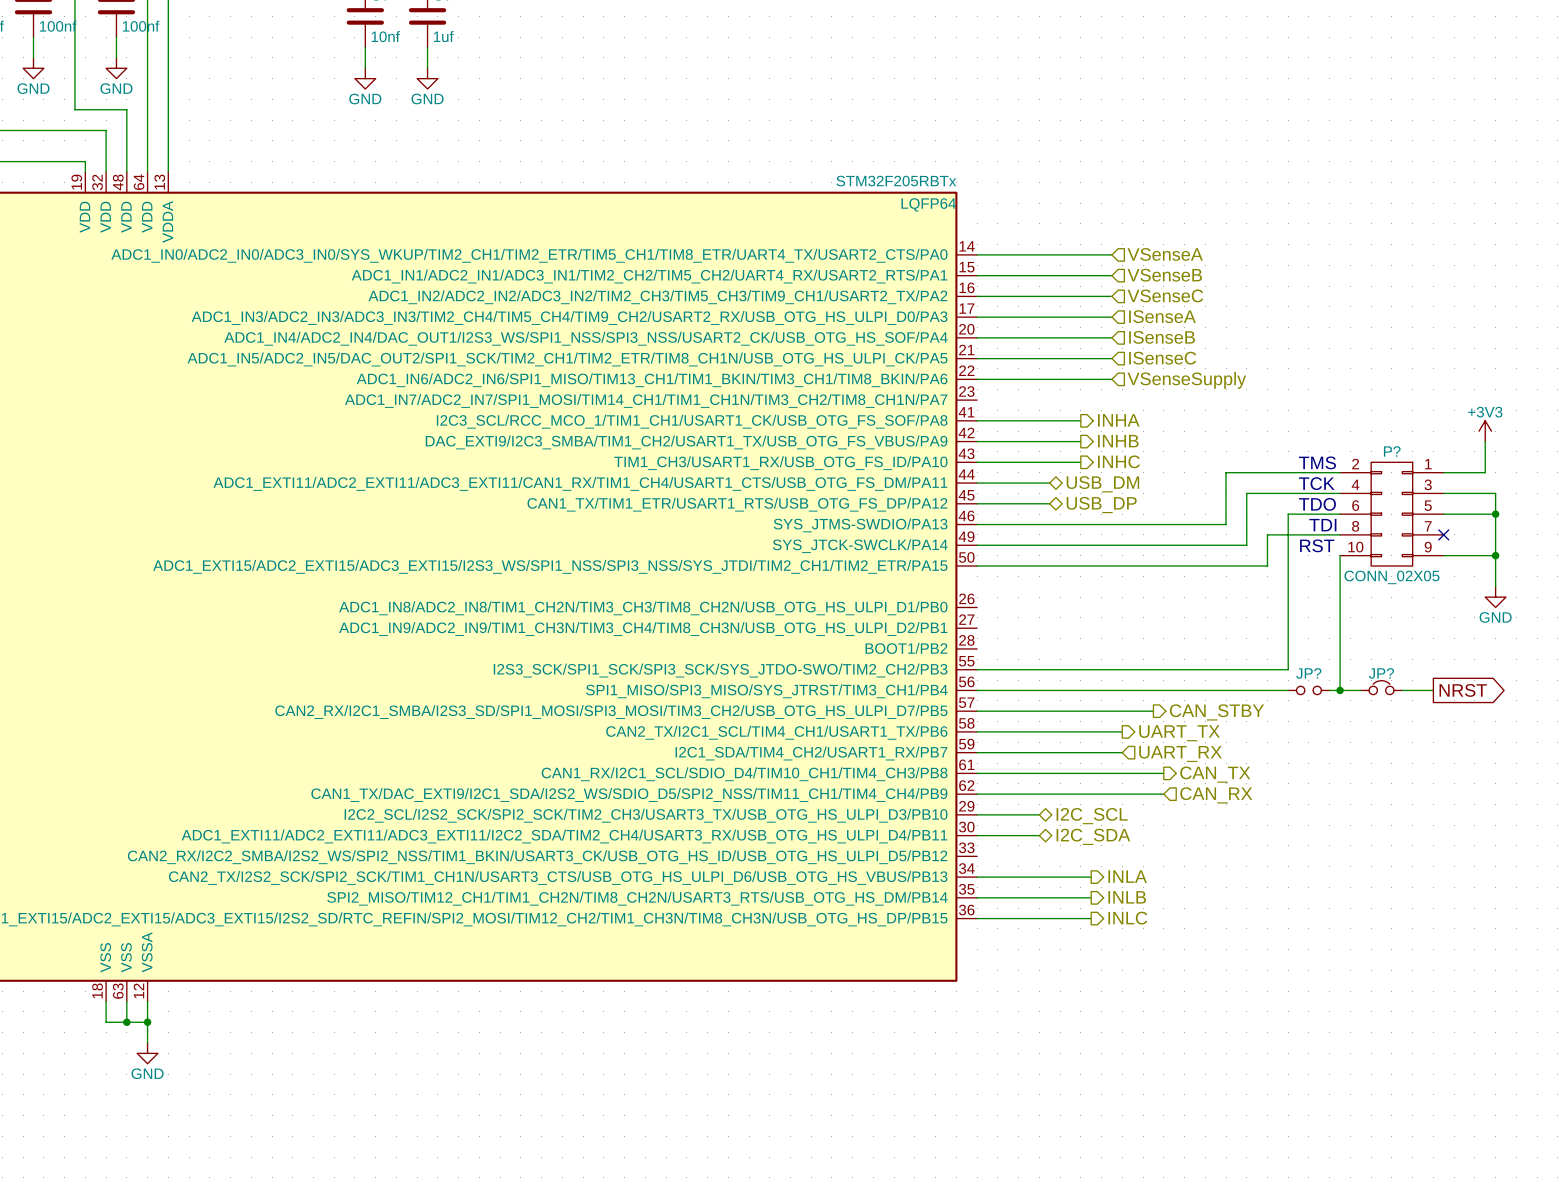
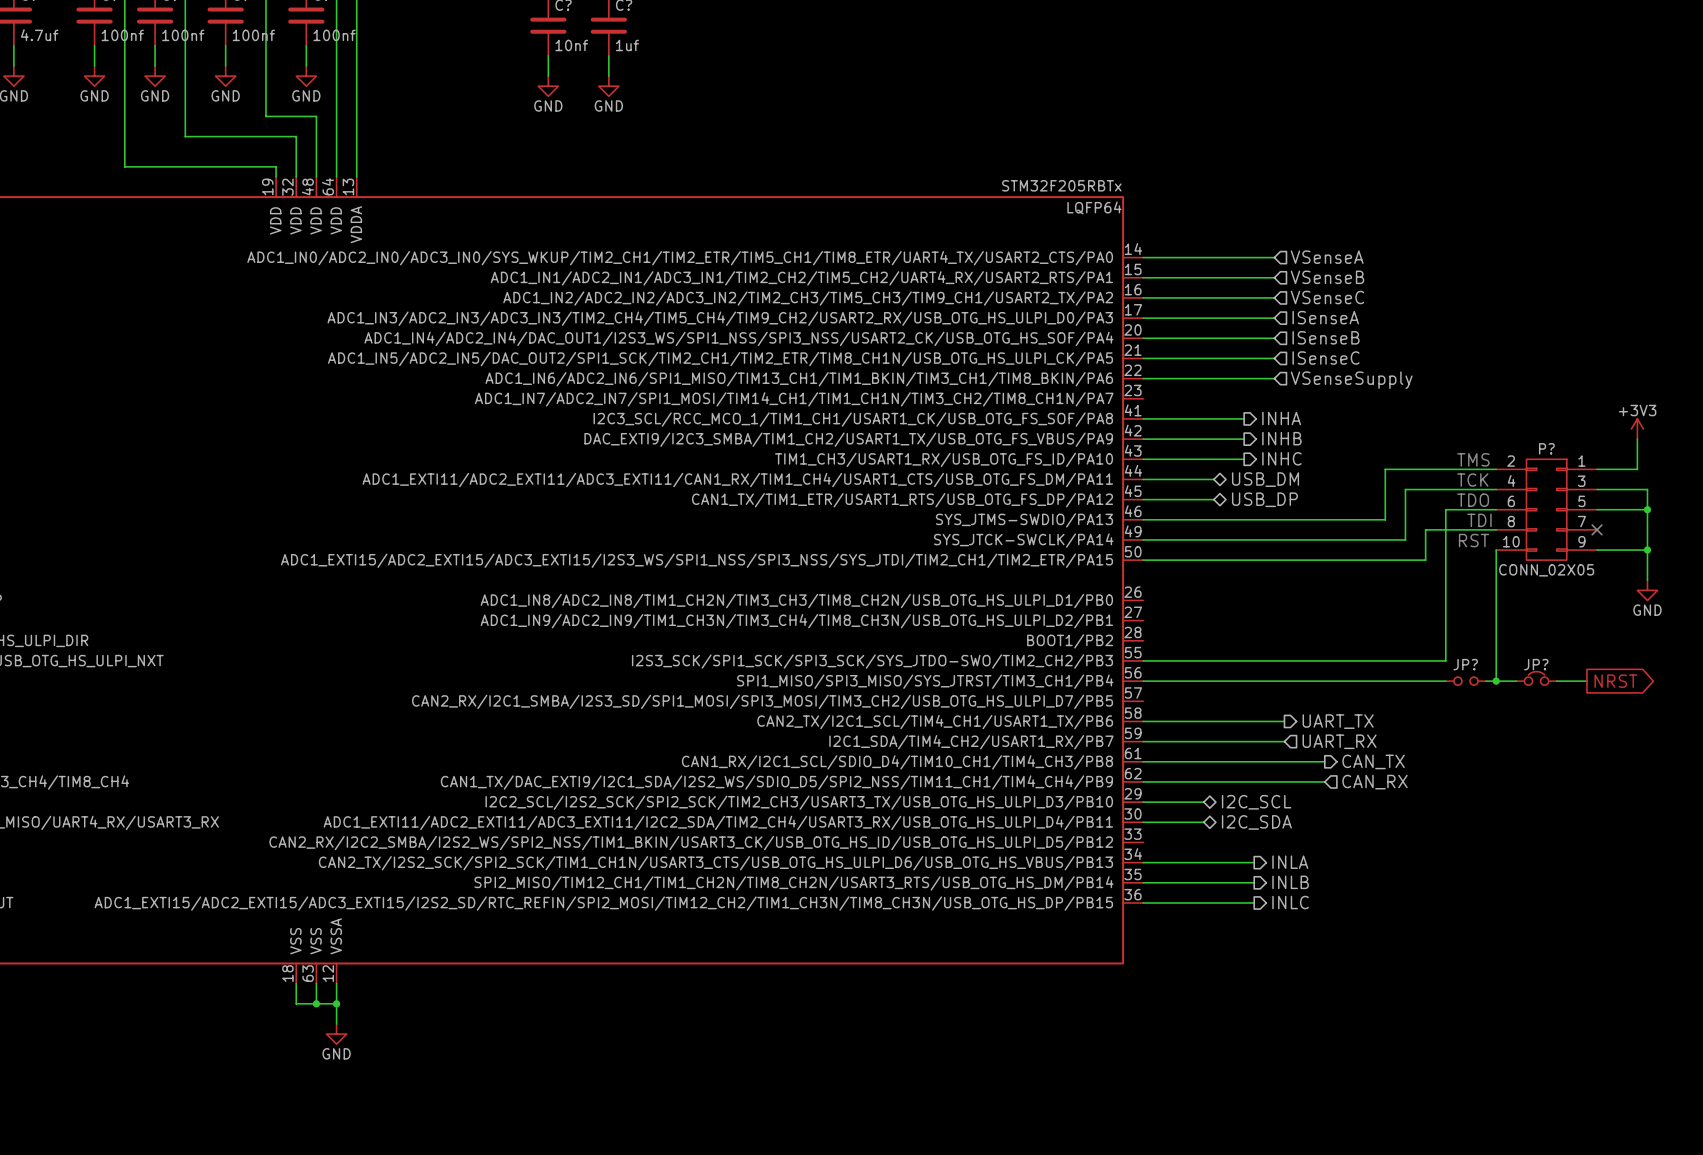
wire: (977, 711) (1153, 711) -> none
hierarchical label: CAN_STBY (1216, 712) -> none

